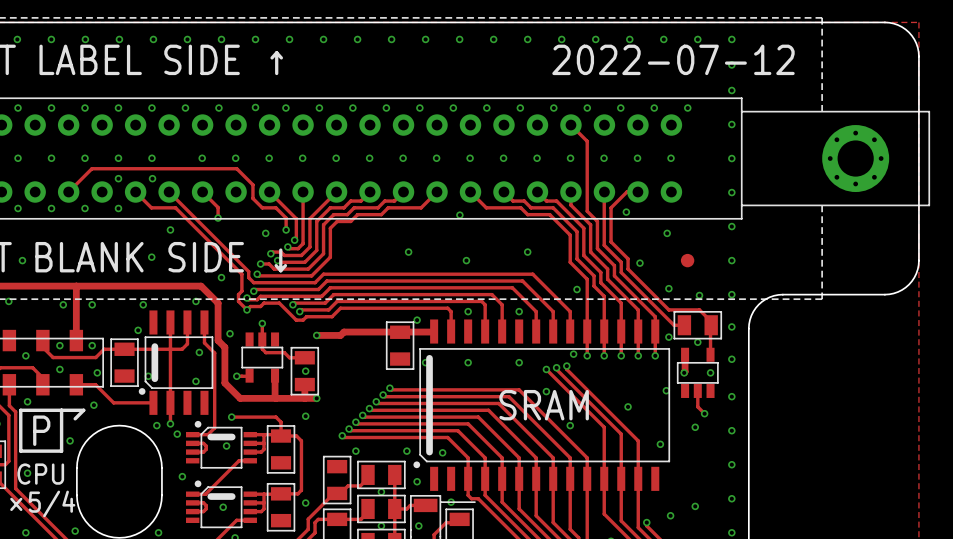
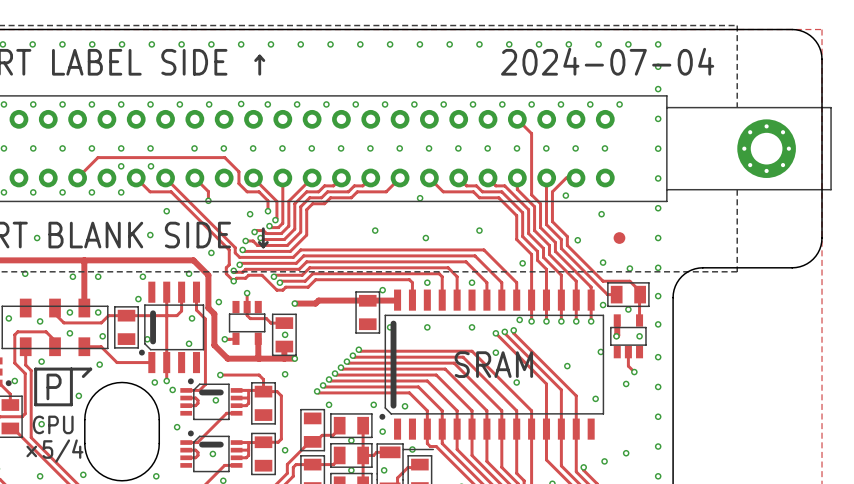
text: 2022-07-12 (673, 59) -> 2024-07-04 (607, 61)

